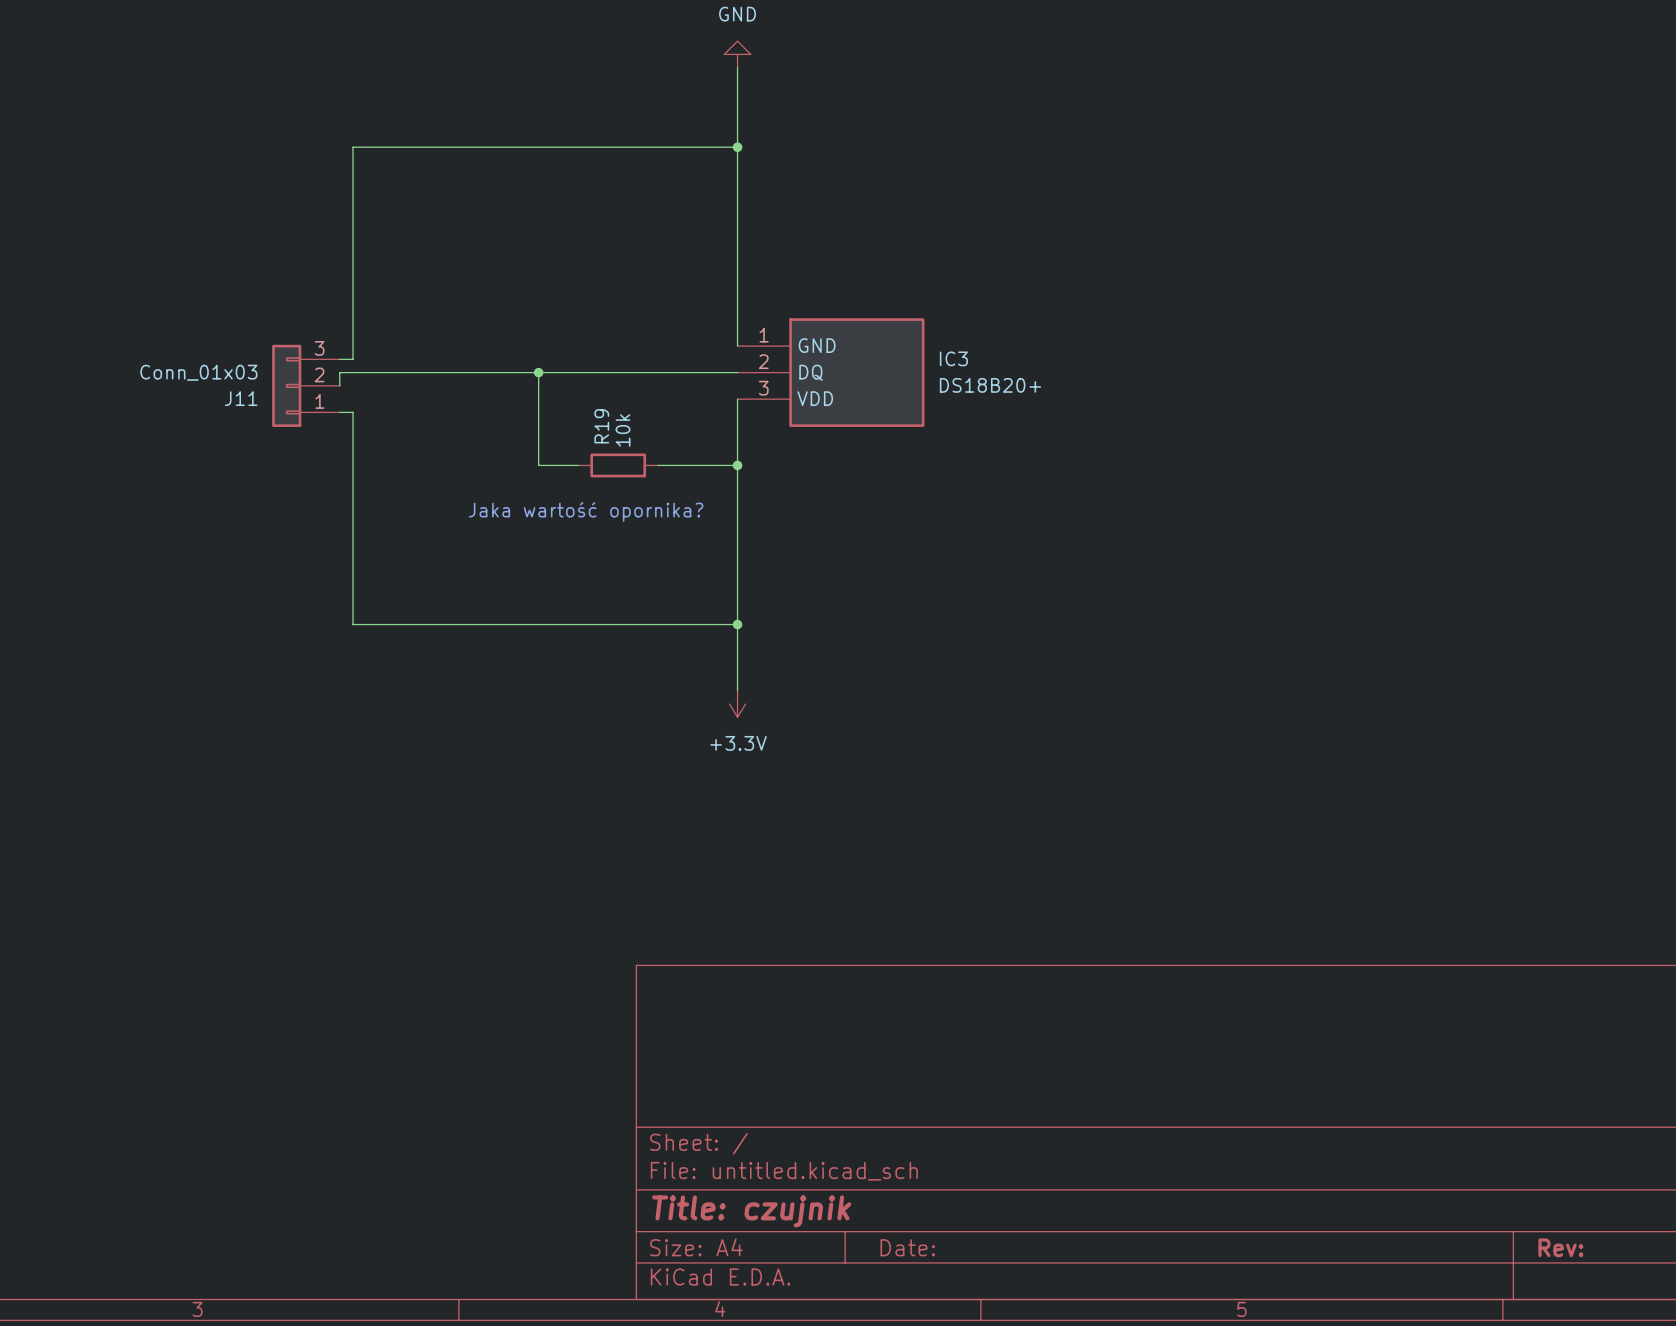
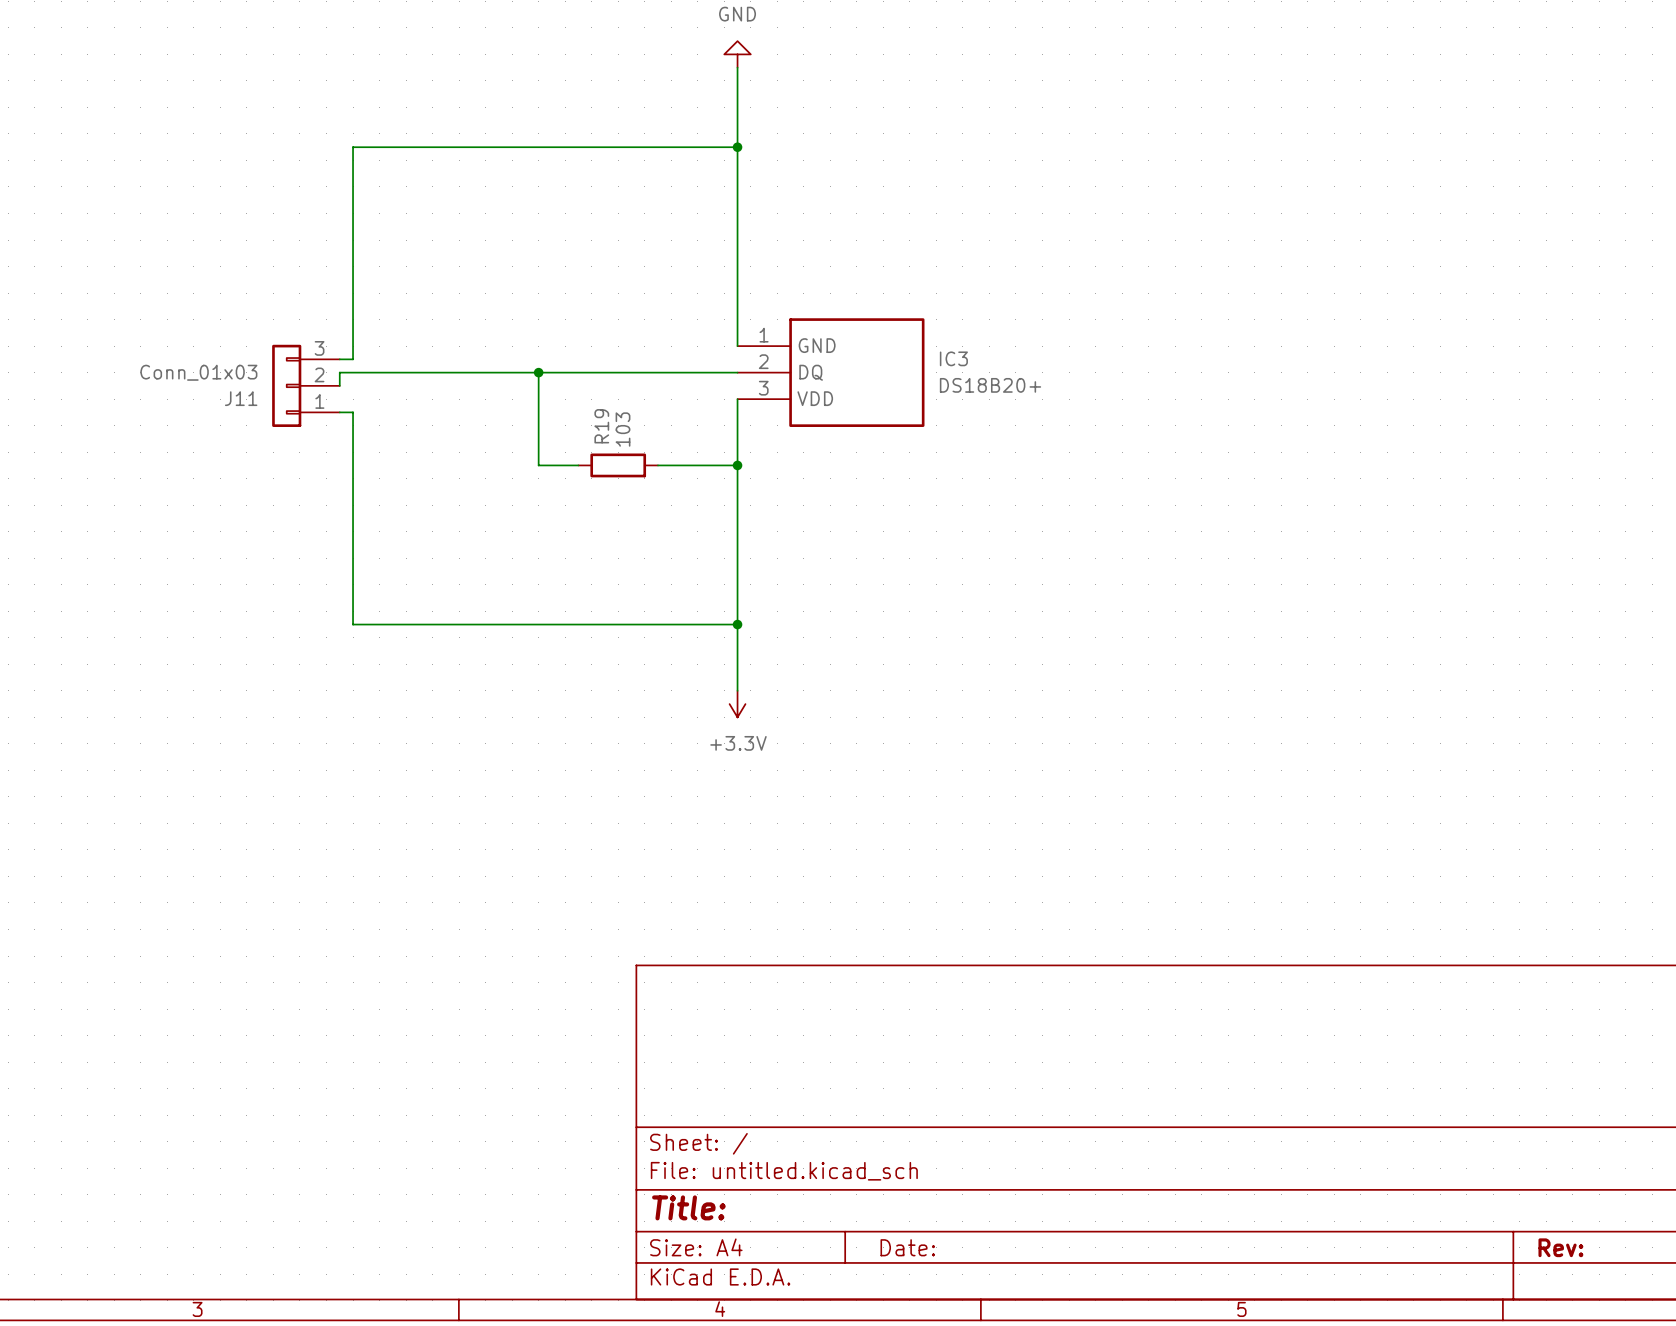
R19 value: 10k (623, 430) -> 103 (623, 429)
text: Jaka wartość opornika? (586, 511) -> none
title block: Title: czujnik (751, 1211) -> Title: (688, 1207)

